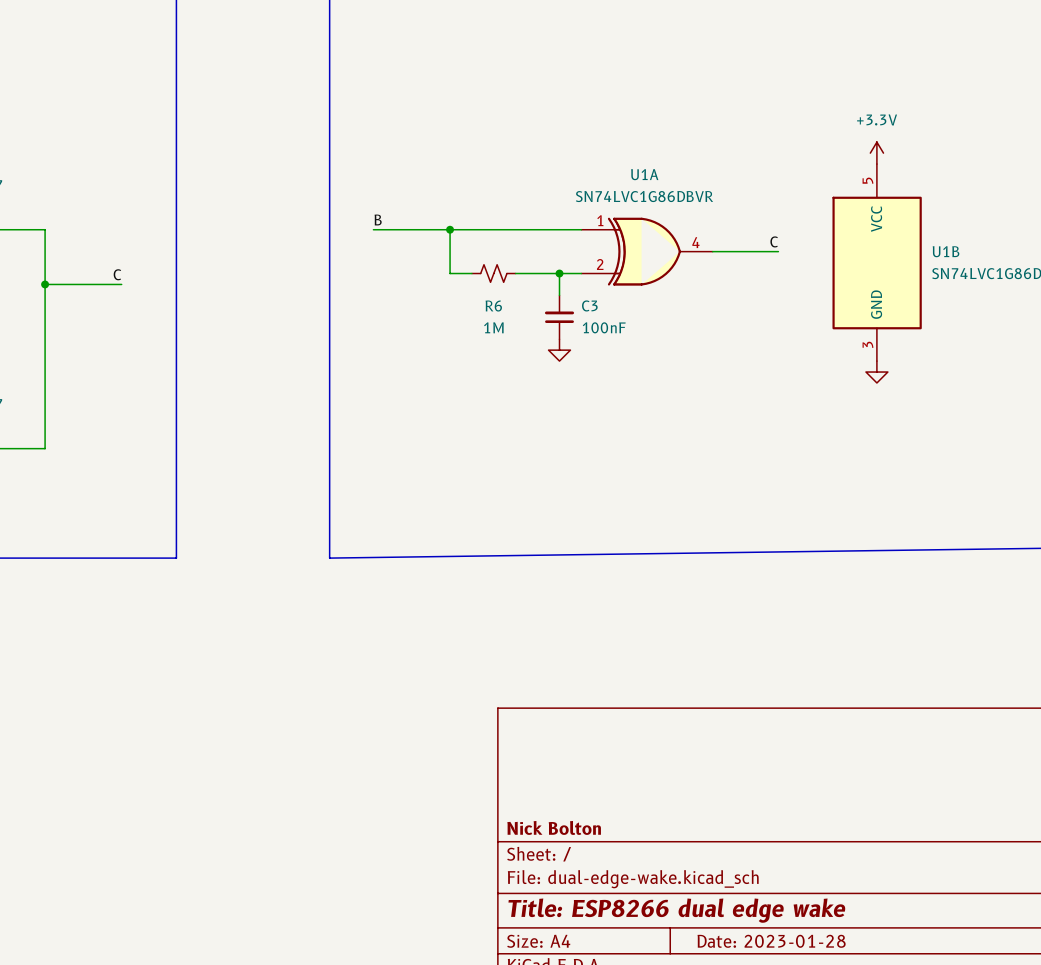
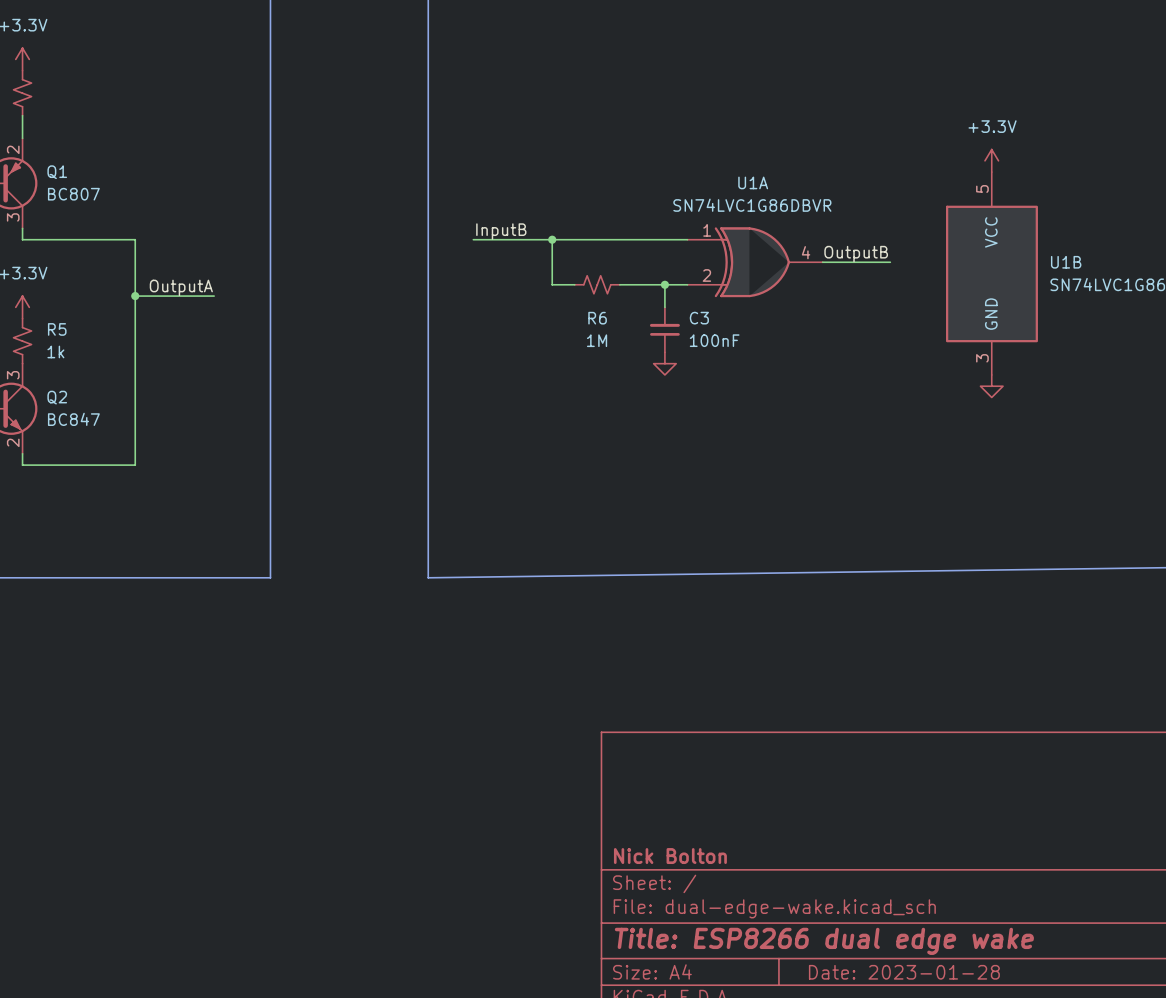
label: B (378, 220) -> InputB (501, 231)
label: C (774, 241) -> OutputB (856, 254)
label: C (117, 274) -> OutputA (181, 287)

